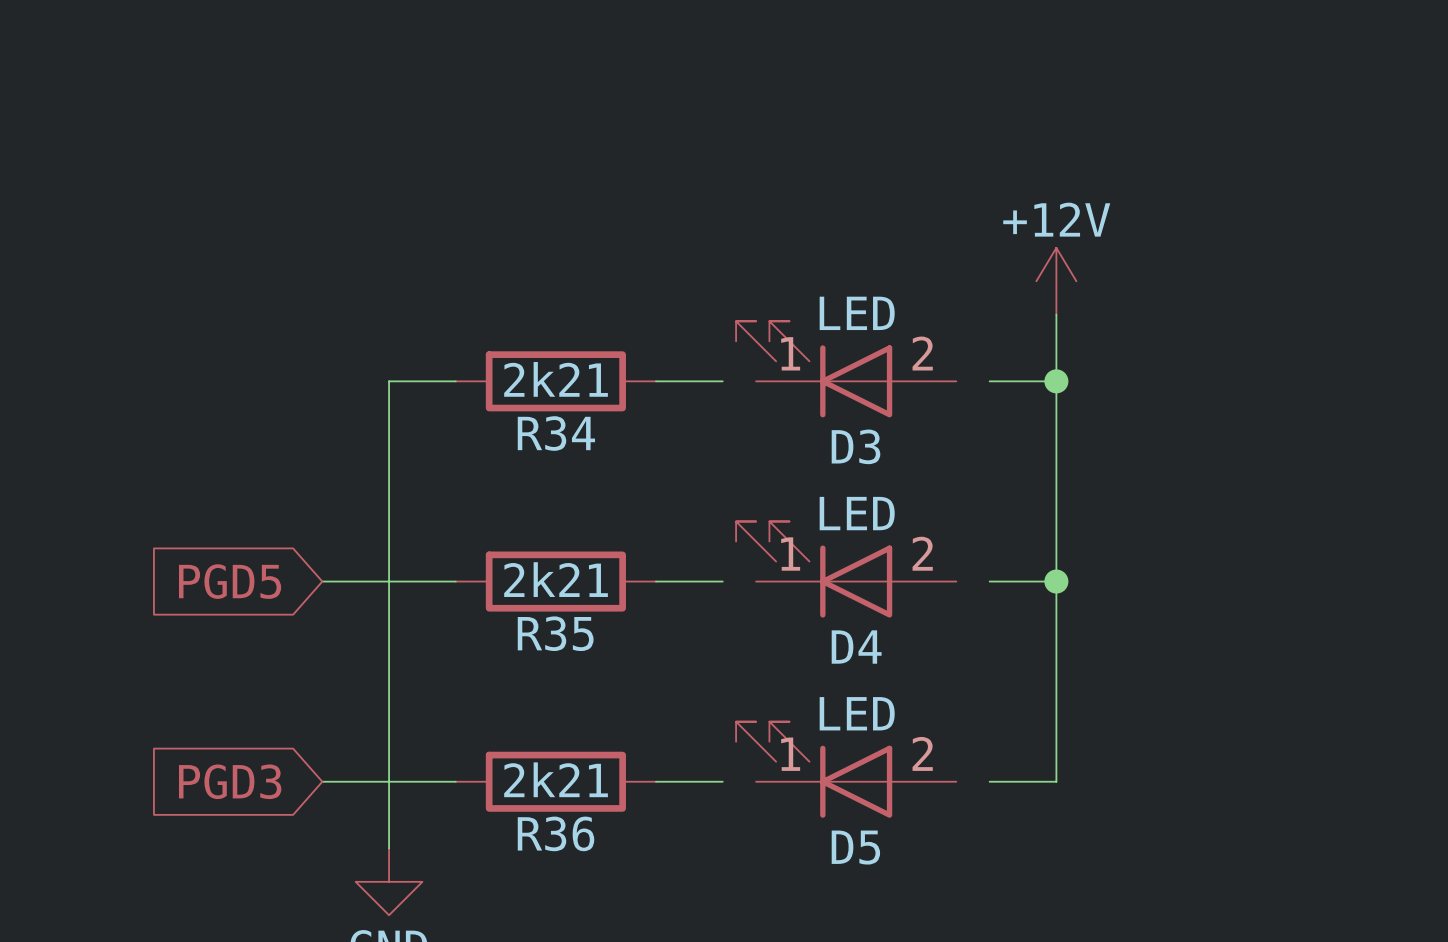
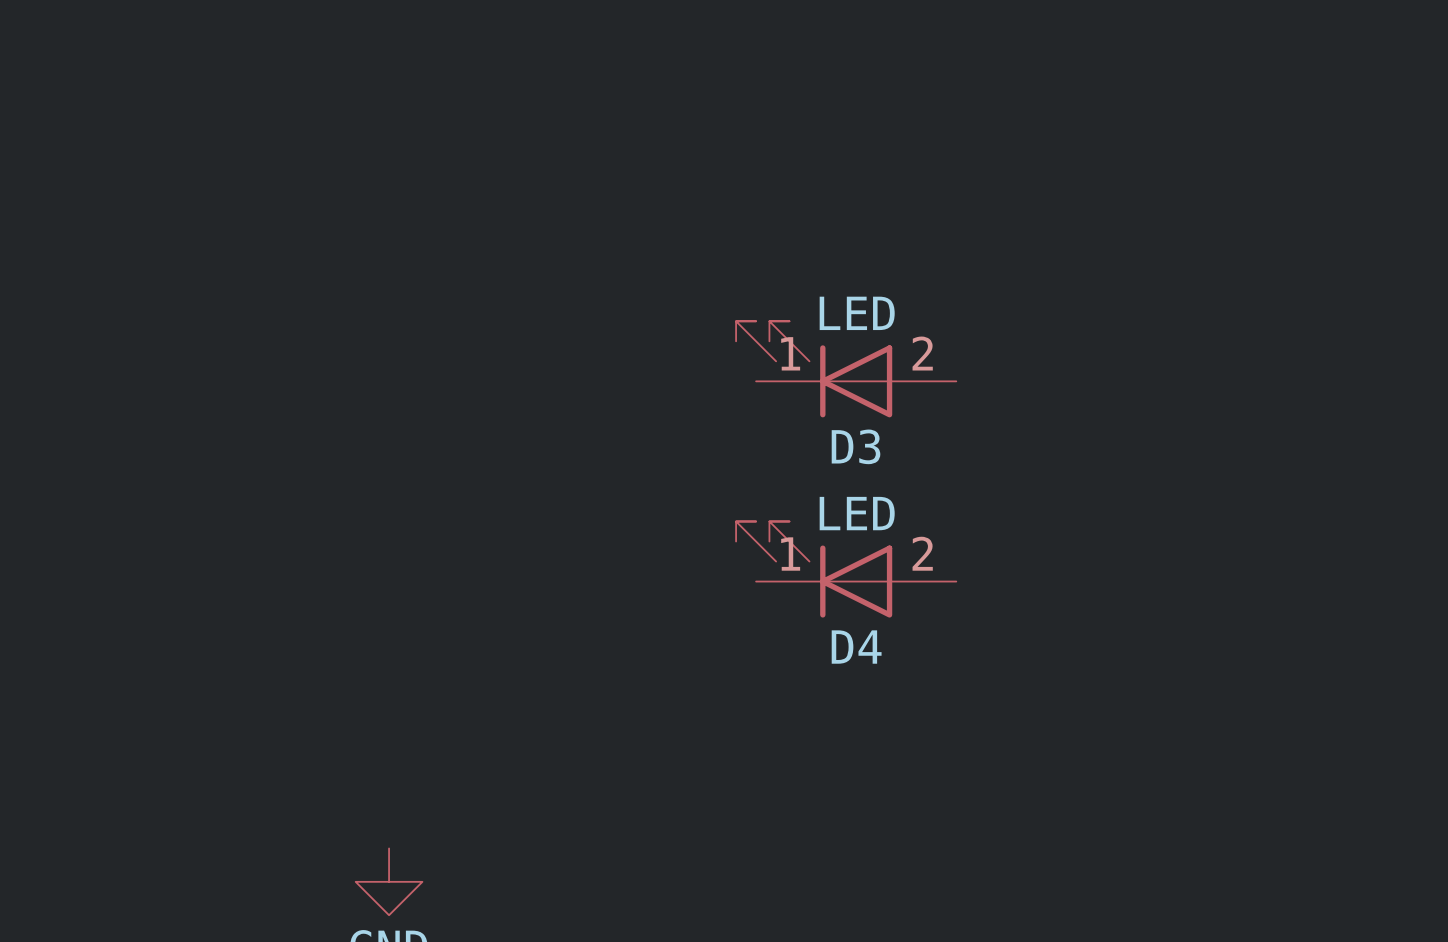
power symbol: +12V (1056, 281) -> none
wire: (1056, 314) (1056, 781) (989, 781) -> none
wire: (455, 381) (389, 381) (389, 848) -> none
R34: 2k21 (555, 381) -> none
wire: (655, 381) (722, 381) -> none
wire: (989, 381) (1056, 381) -> none
junction: (1056, 381) -> none
global label: PGD5 (230, 581) -> none
wire: (322, 581) (455, 581) -> none
R35: 2k21 (555, 581) -> none
wire: (655, 581) (722, 581) -> none
wire: (989, 581) (1056, 581) -> none
junction: (1056, 581) -> none
D5: LED (846, 769) -> none
global label: PGD3 (230, 781) -> none
wire: (322, 781) (455, 781) -> none
R36: 2k21 (555, 781) -> none
wire: (655, 781) (722, 781) -> none

